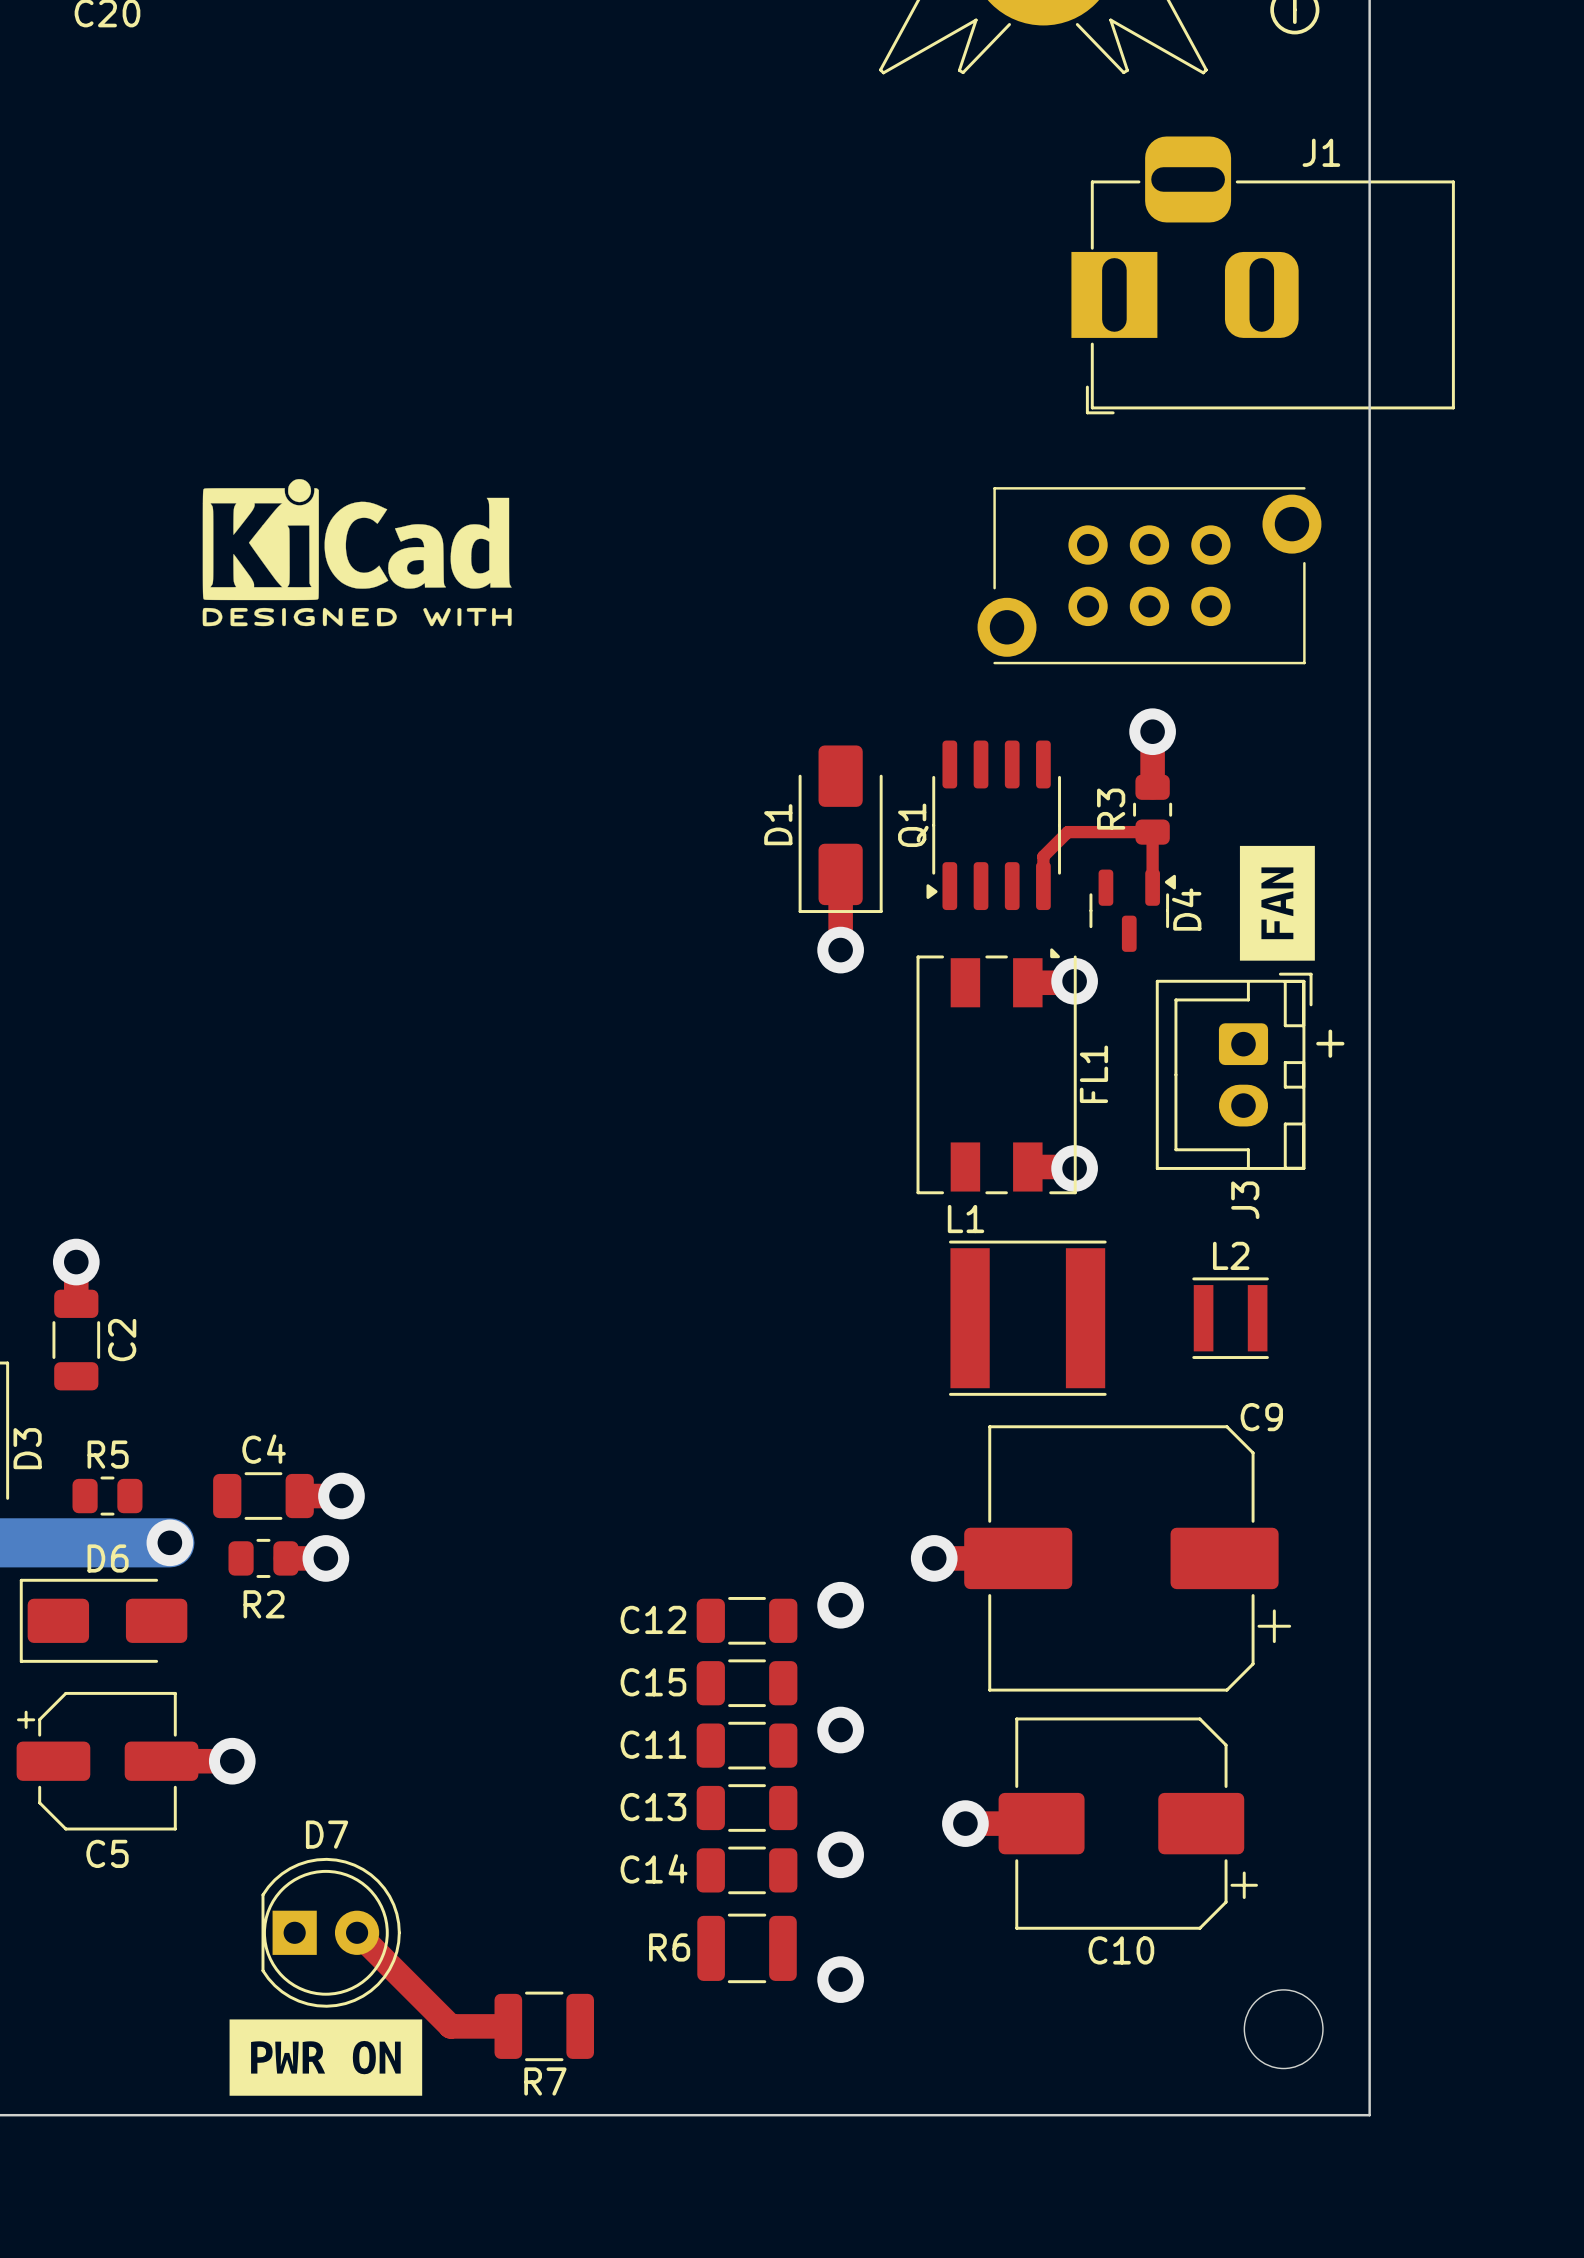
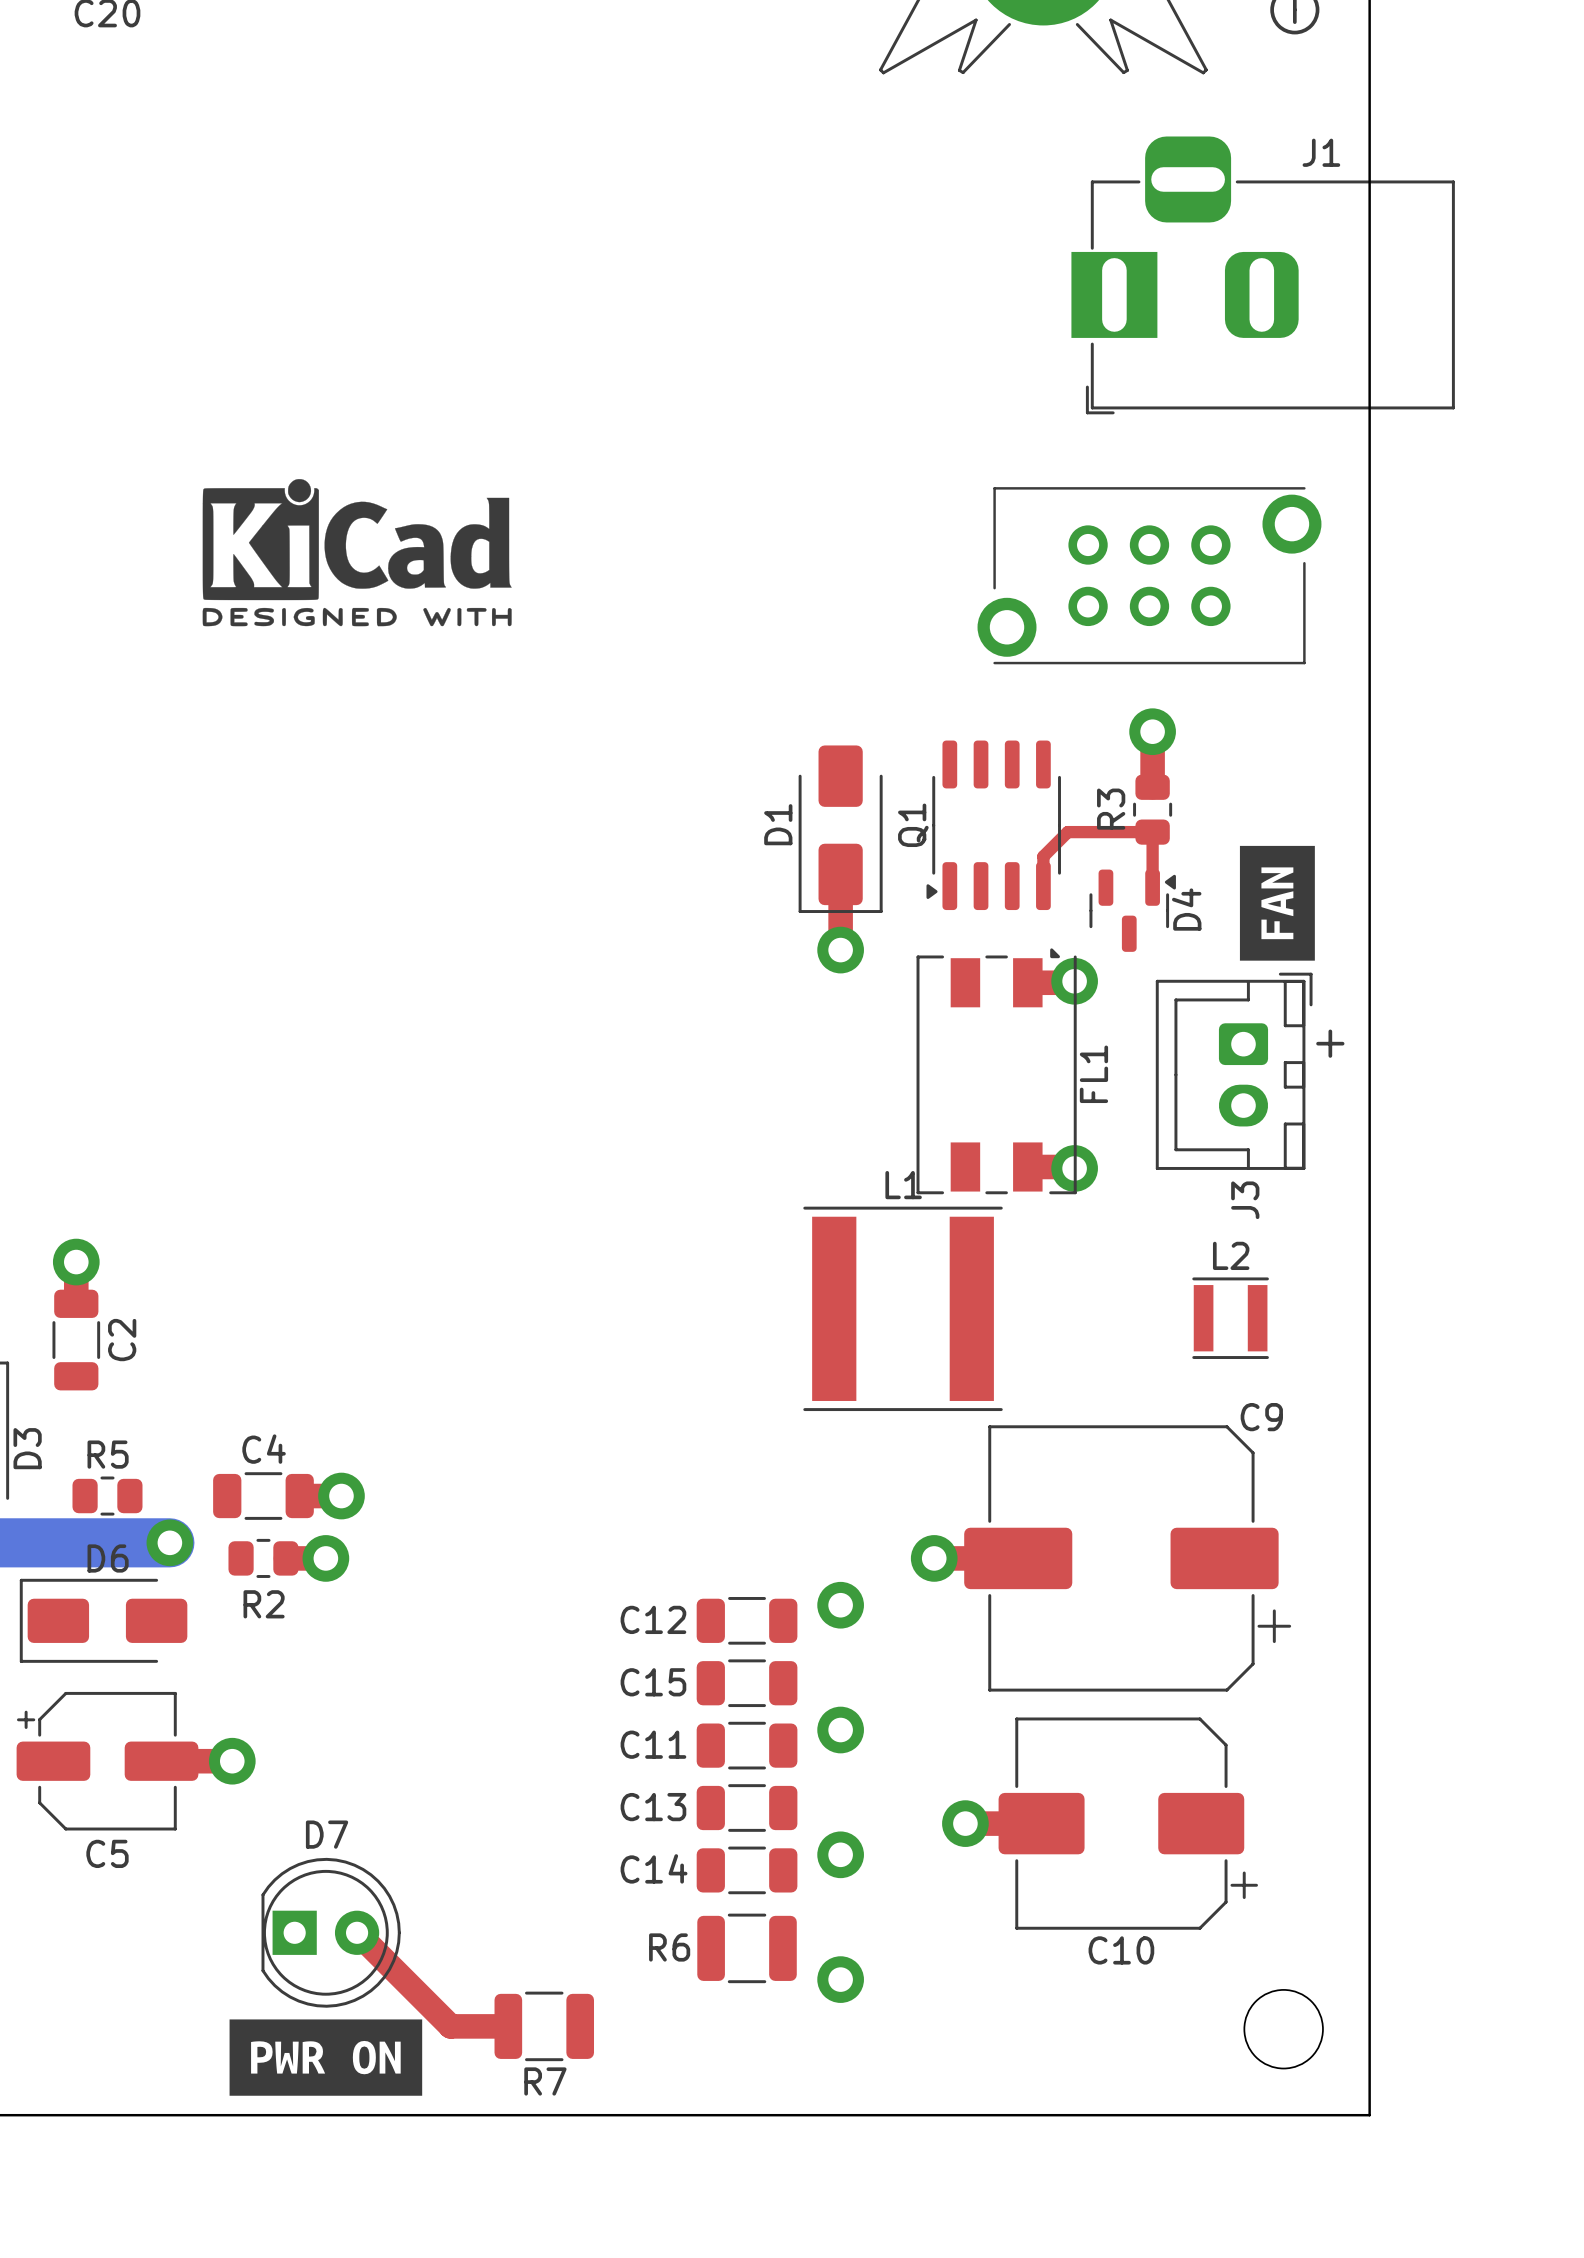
L1 name position: L1 (966, 1219) -> L1 (903, 1185)
L1 footprint: [948, 1240, 1107, 1396] -> [803, 1206, 1003, 1412]

